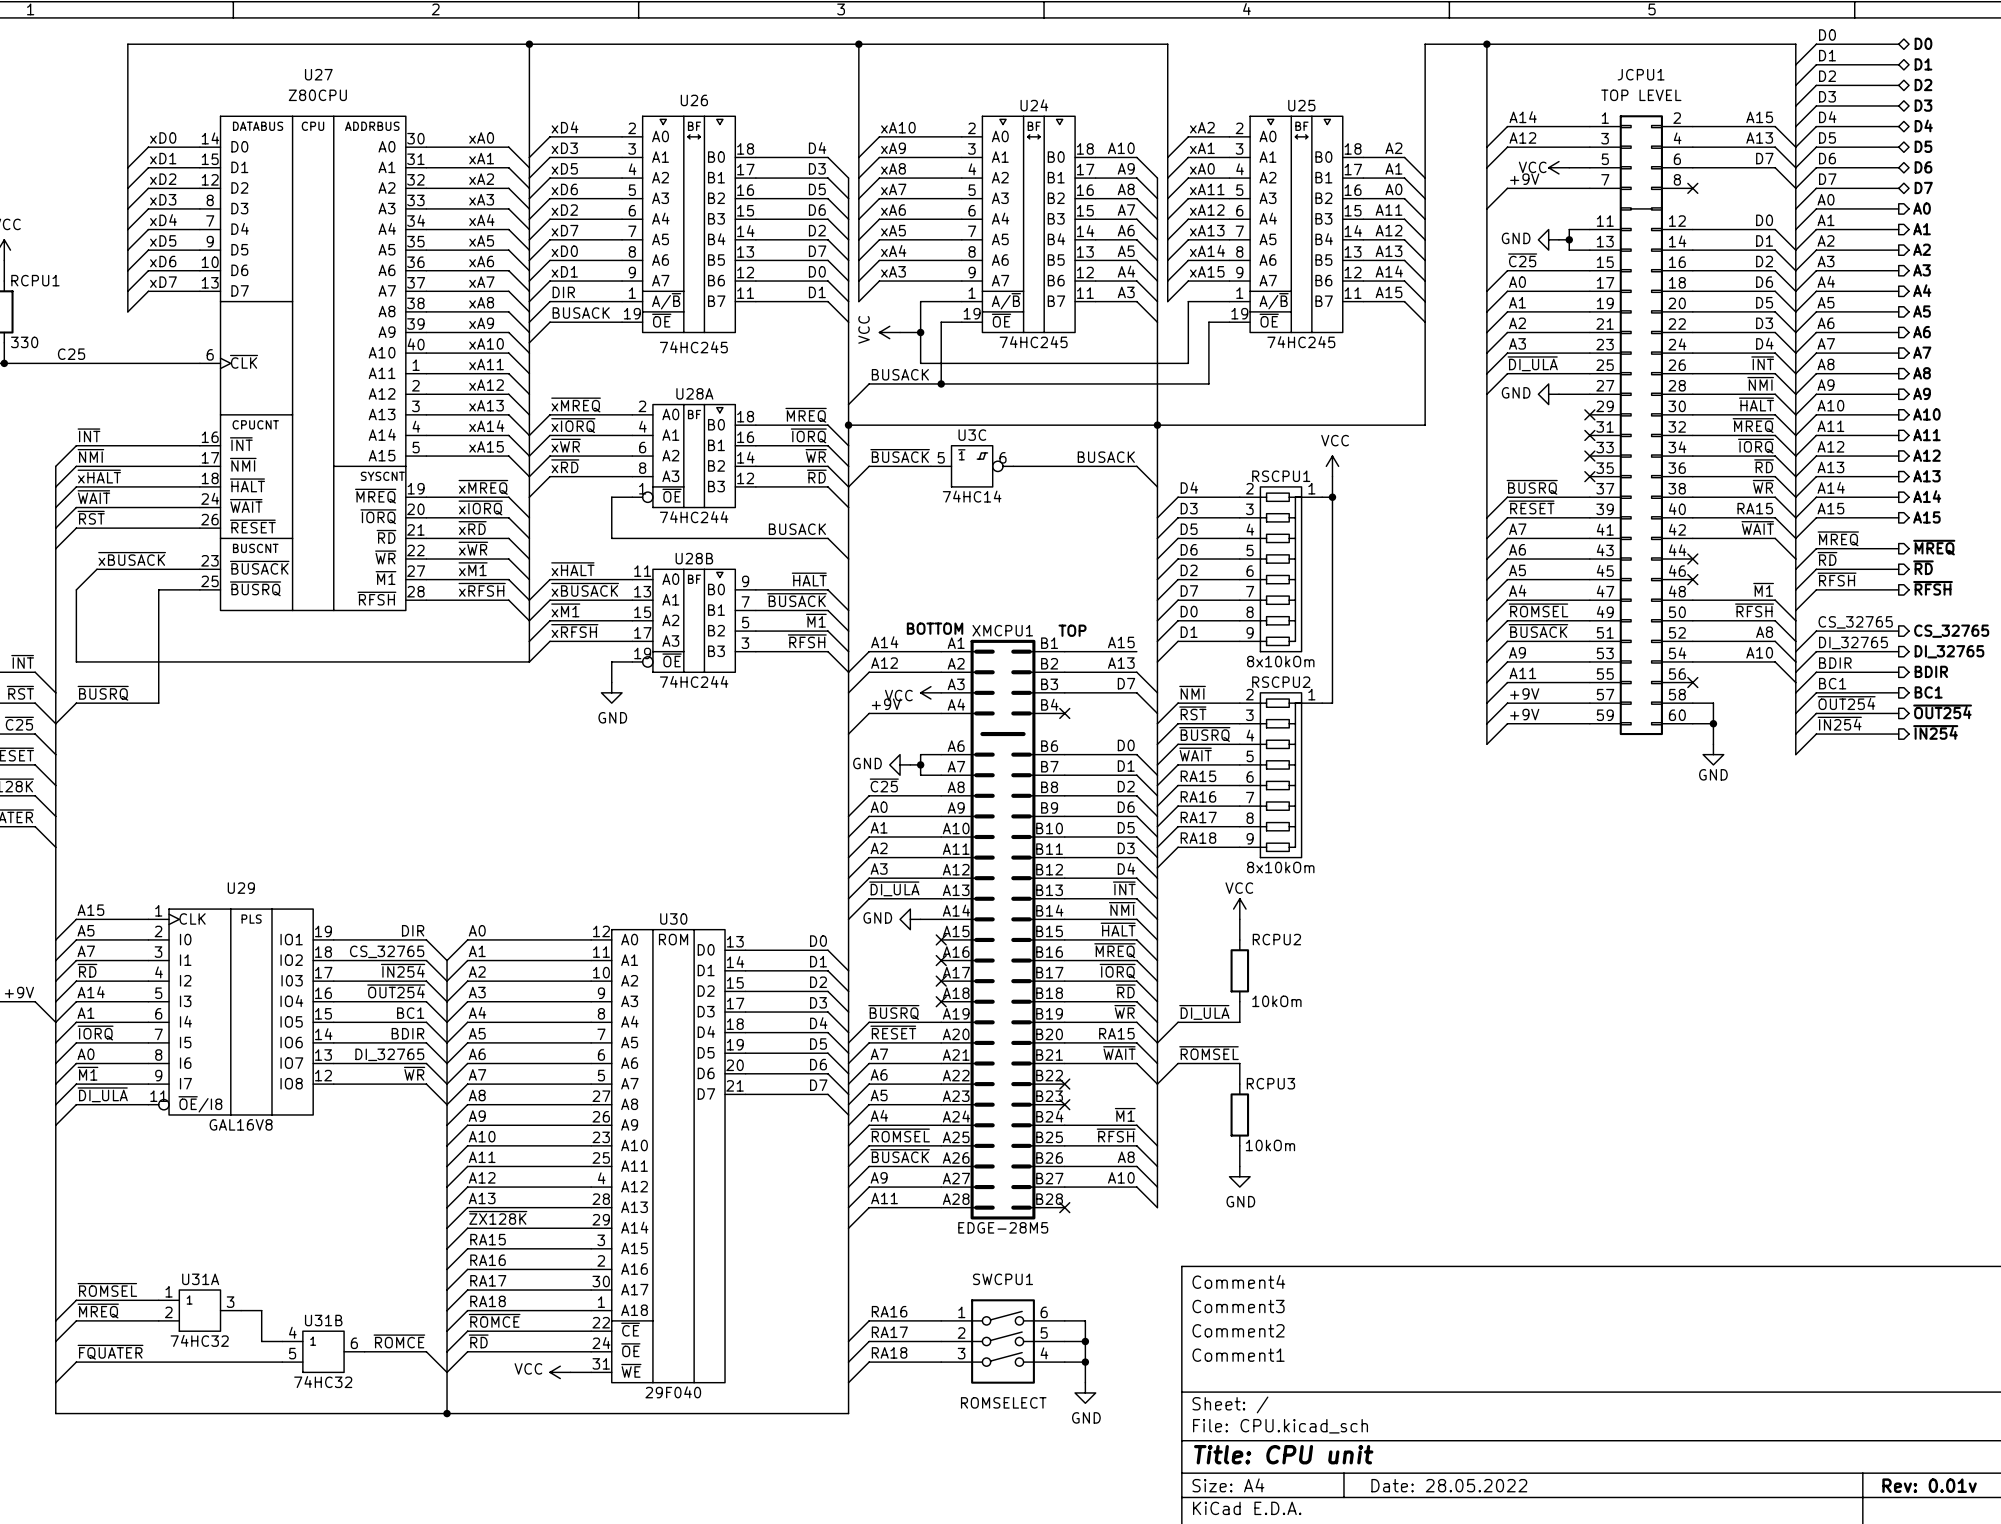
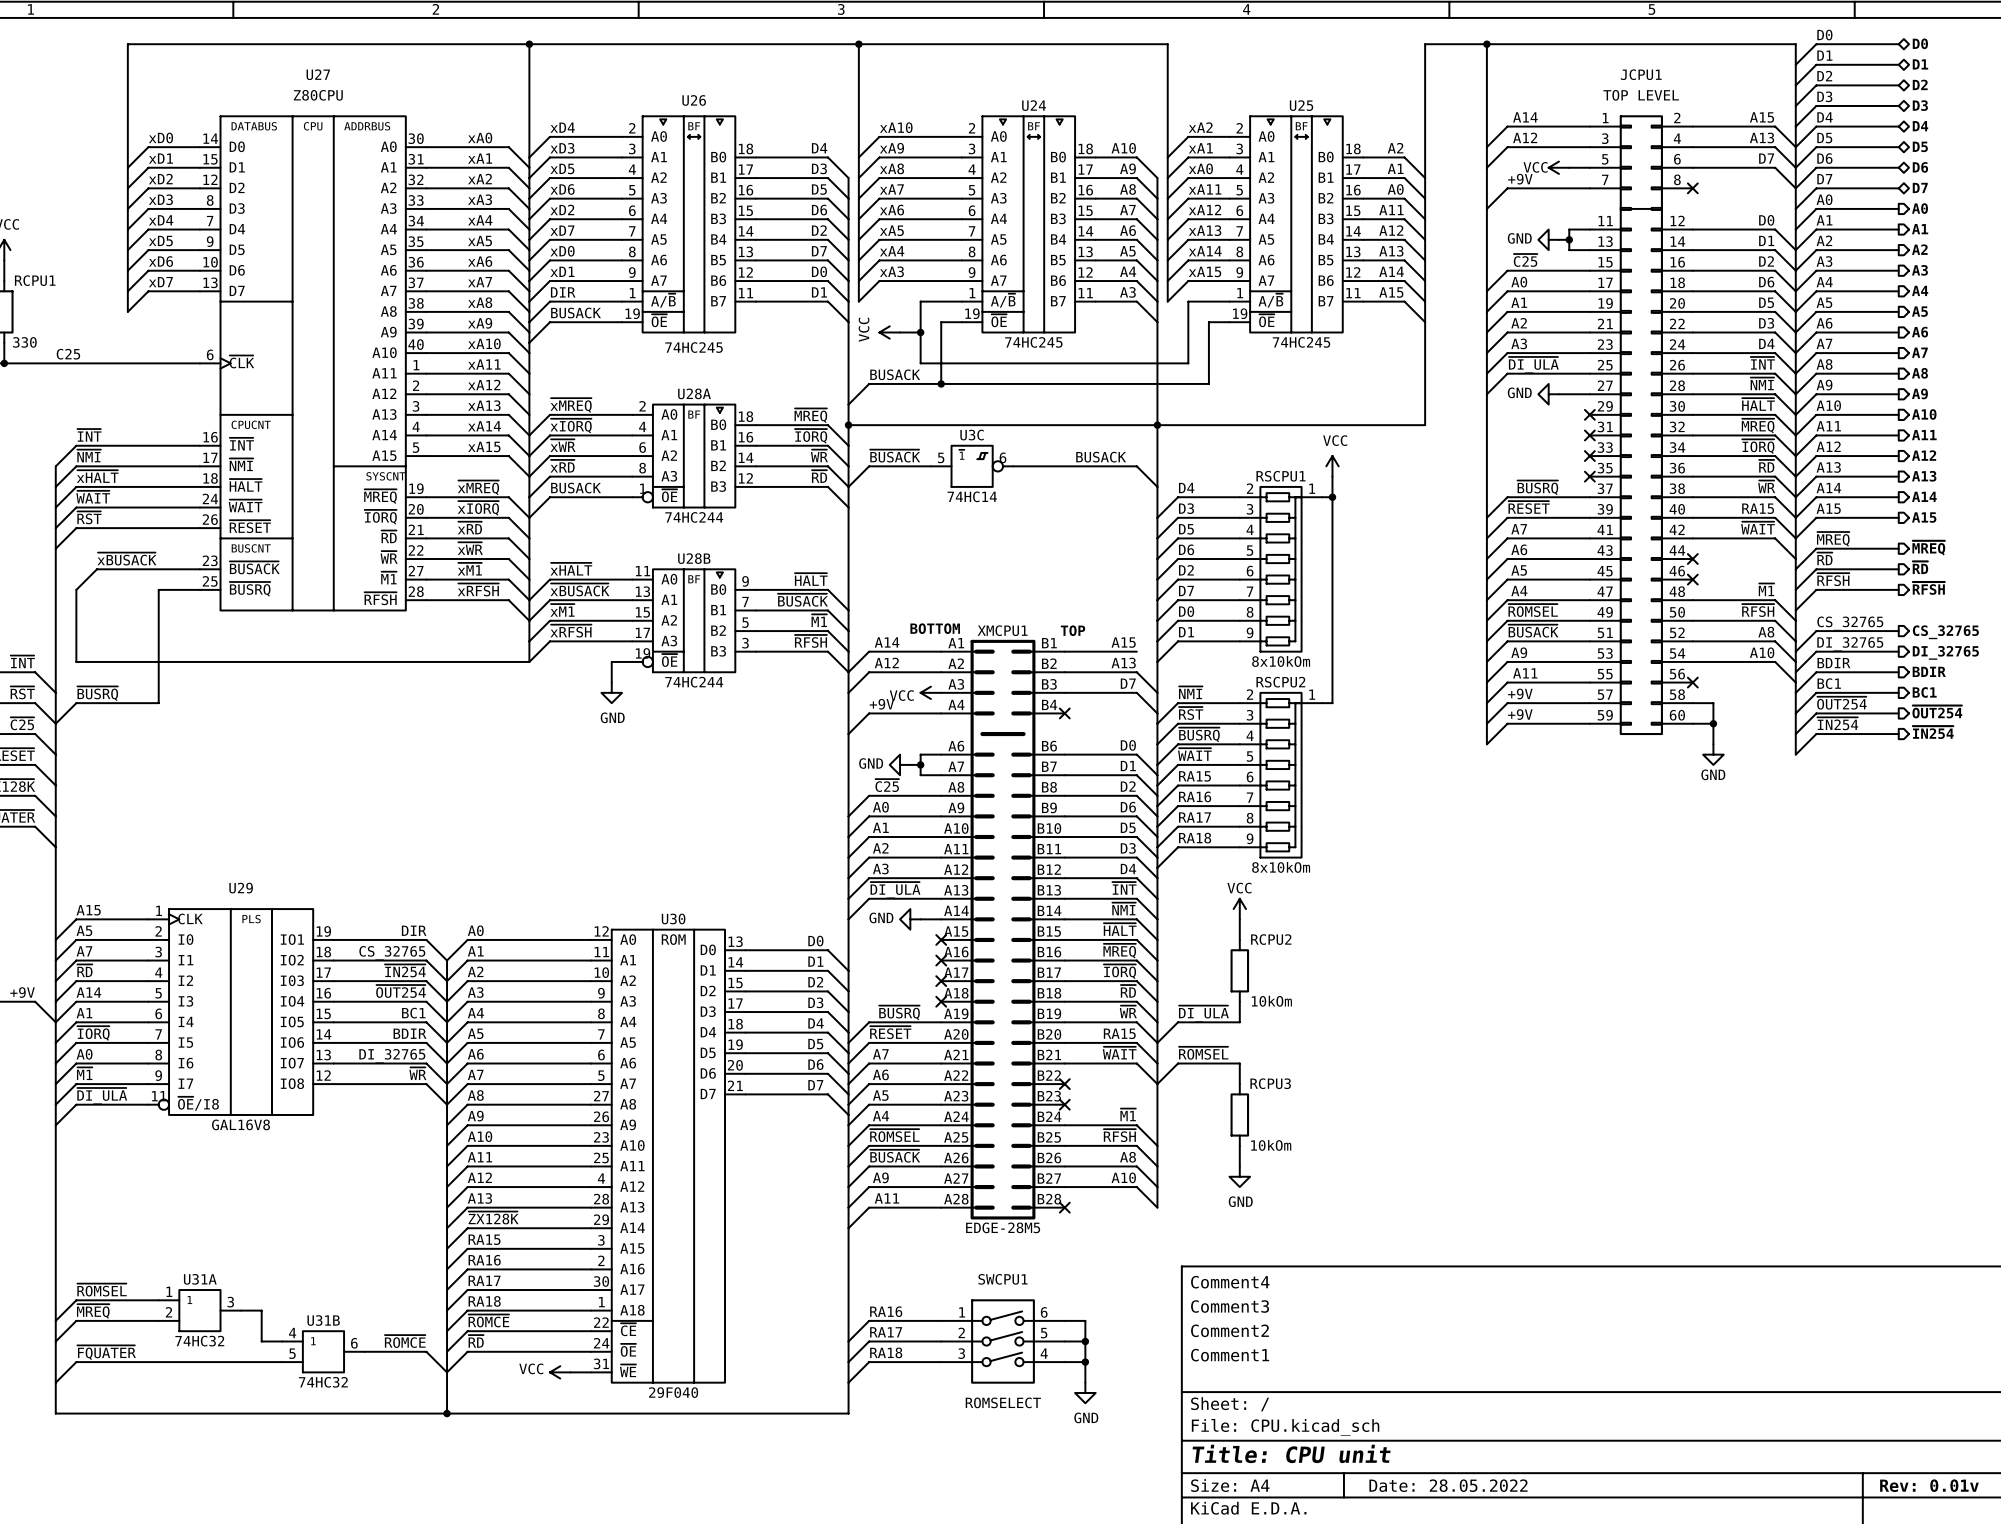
label: none -> BUSACK (576, 488)
wire: (611, 497) (611, 538) (827, 538) (848, 559) -> (611, 497) (549, 497) (529, 517)
label: BUSACK (797, 529) -> none

